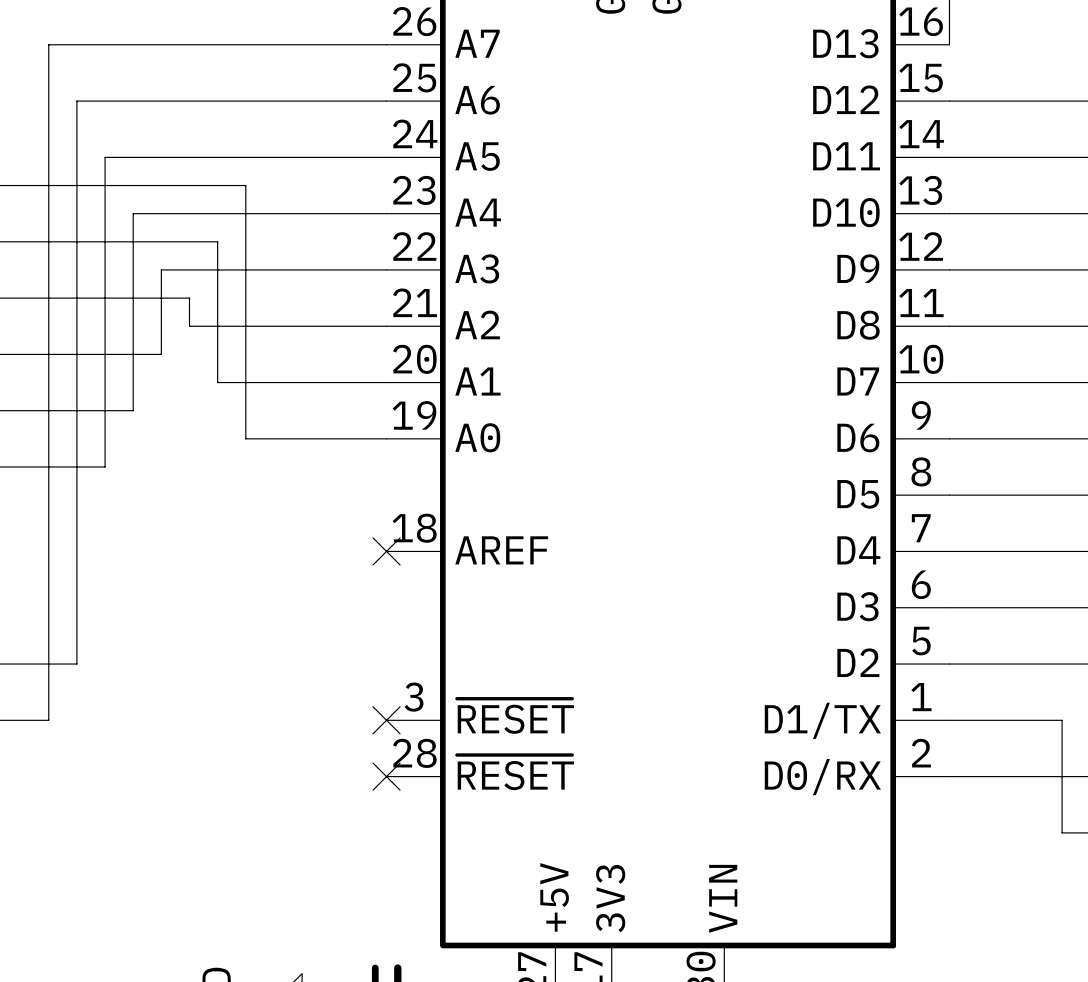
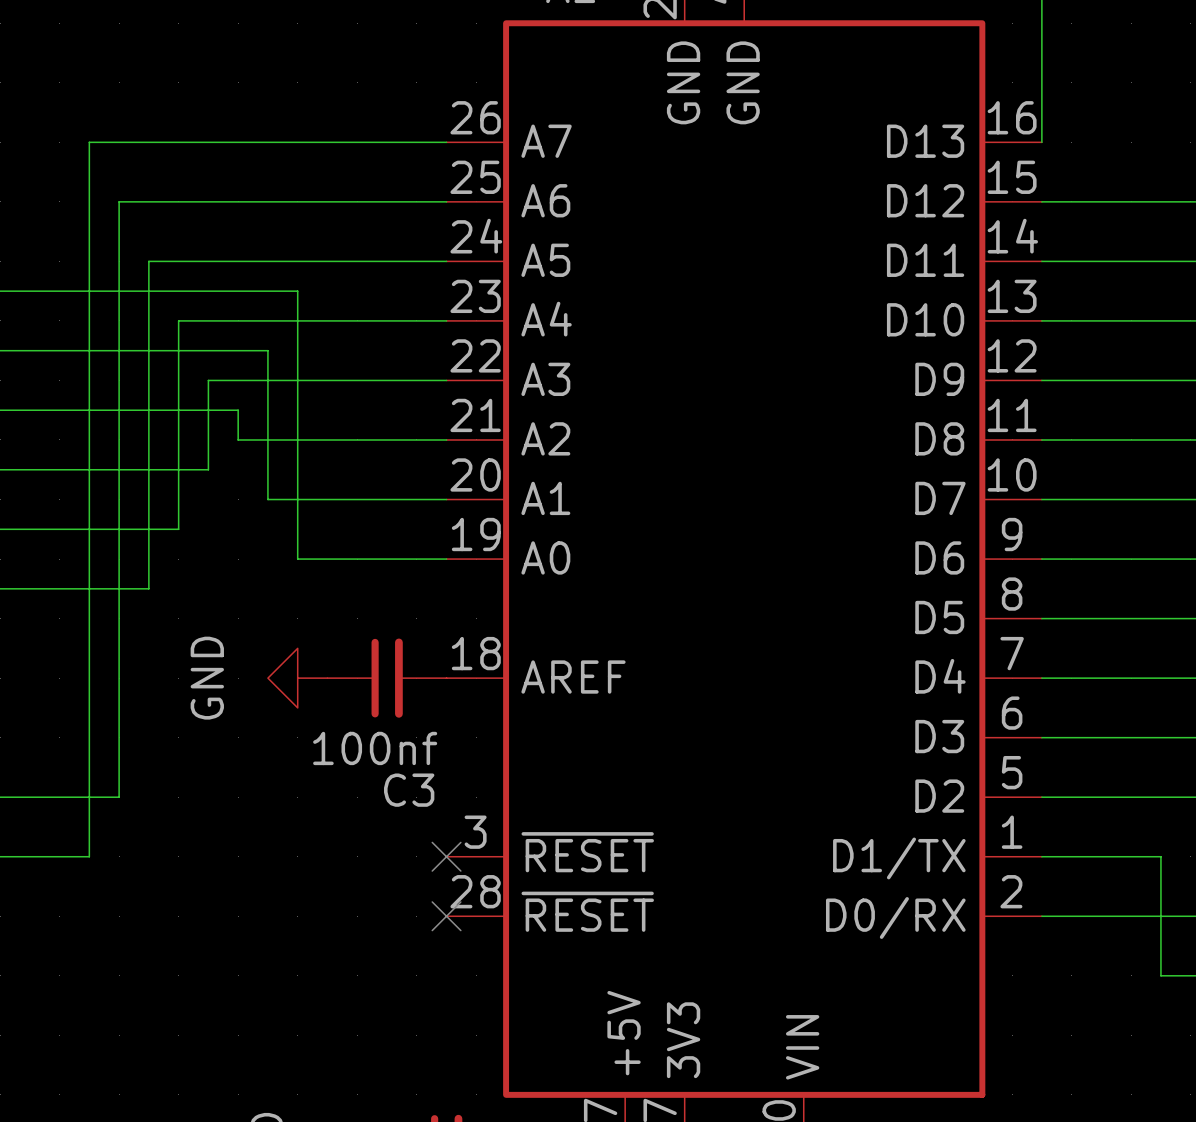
power symbol: none -> GND (297, 678)
C3: none -> 100nf (387, 678)
no-connect mark: (386, 551) -> none

